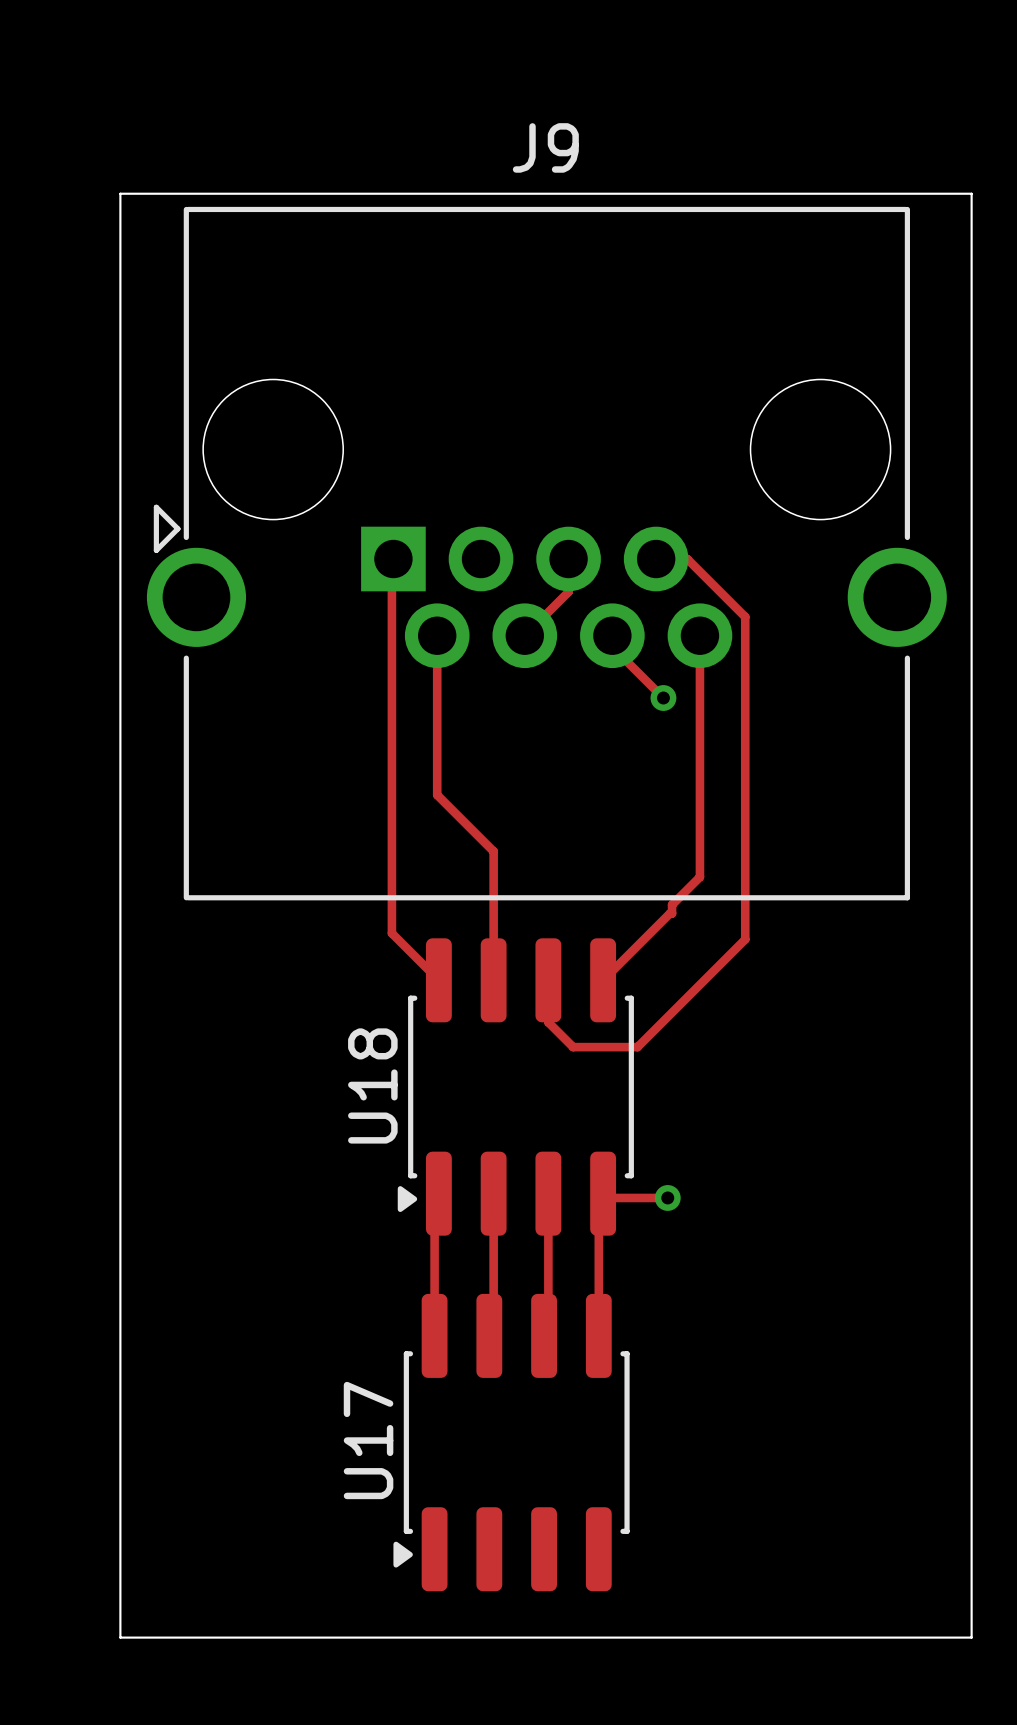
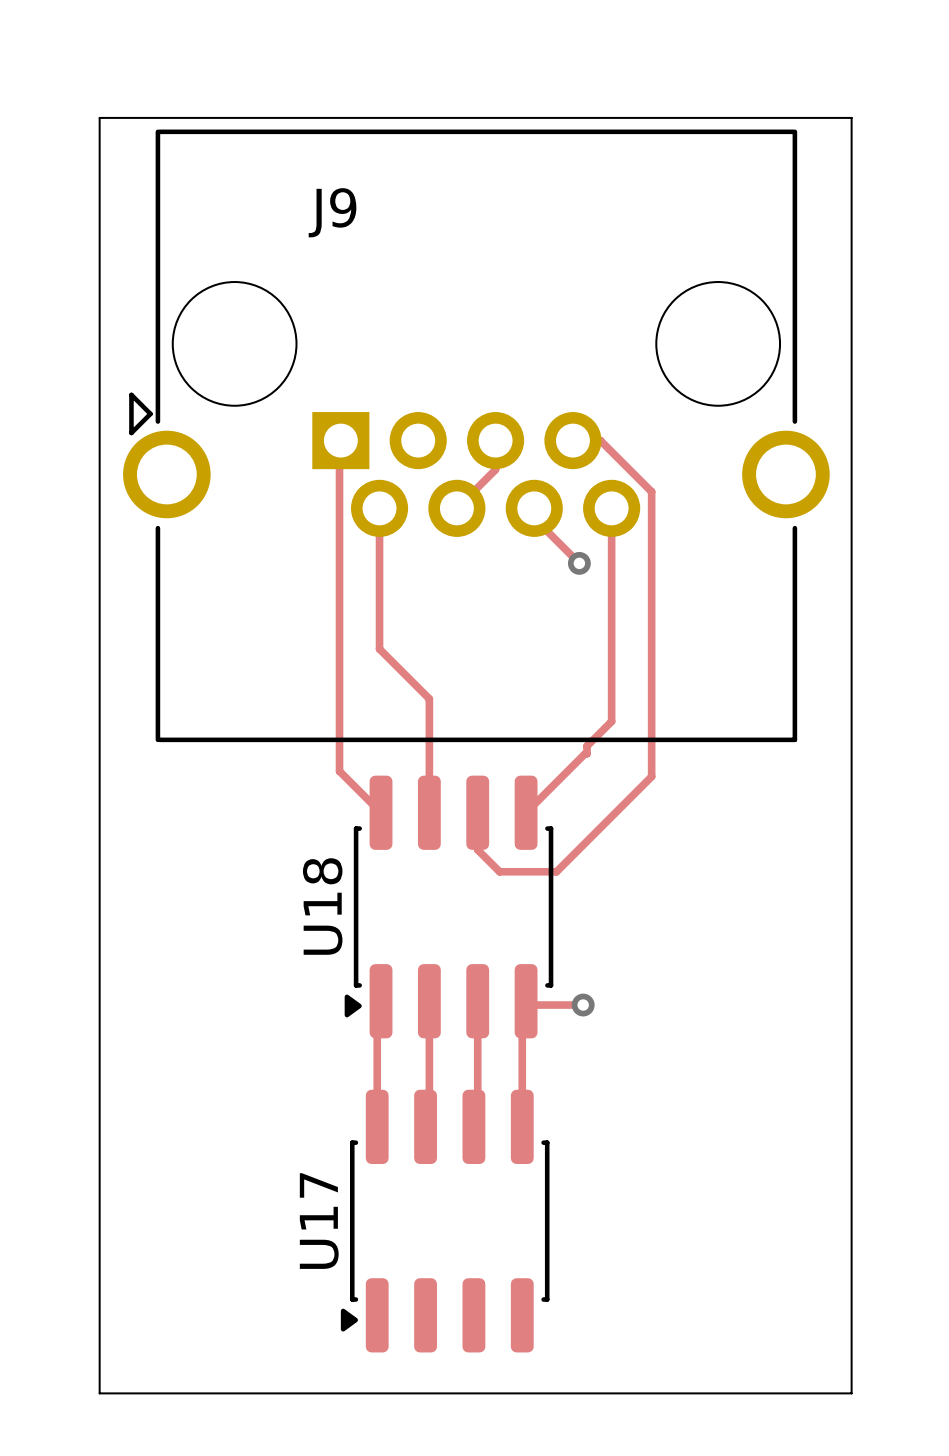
J9 name position: J9 (545, 147) -> J9 (332, 212)

